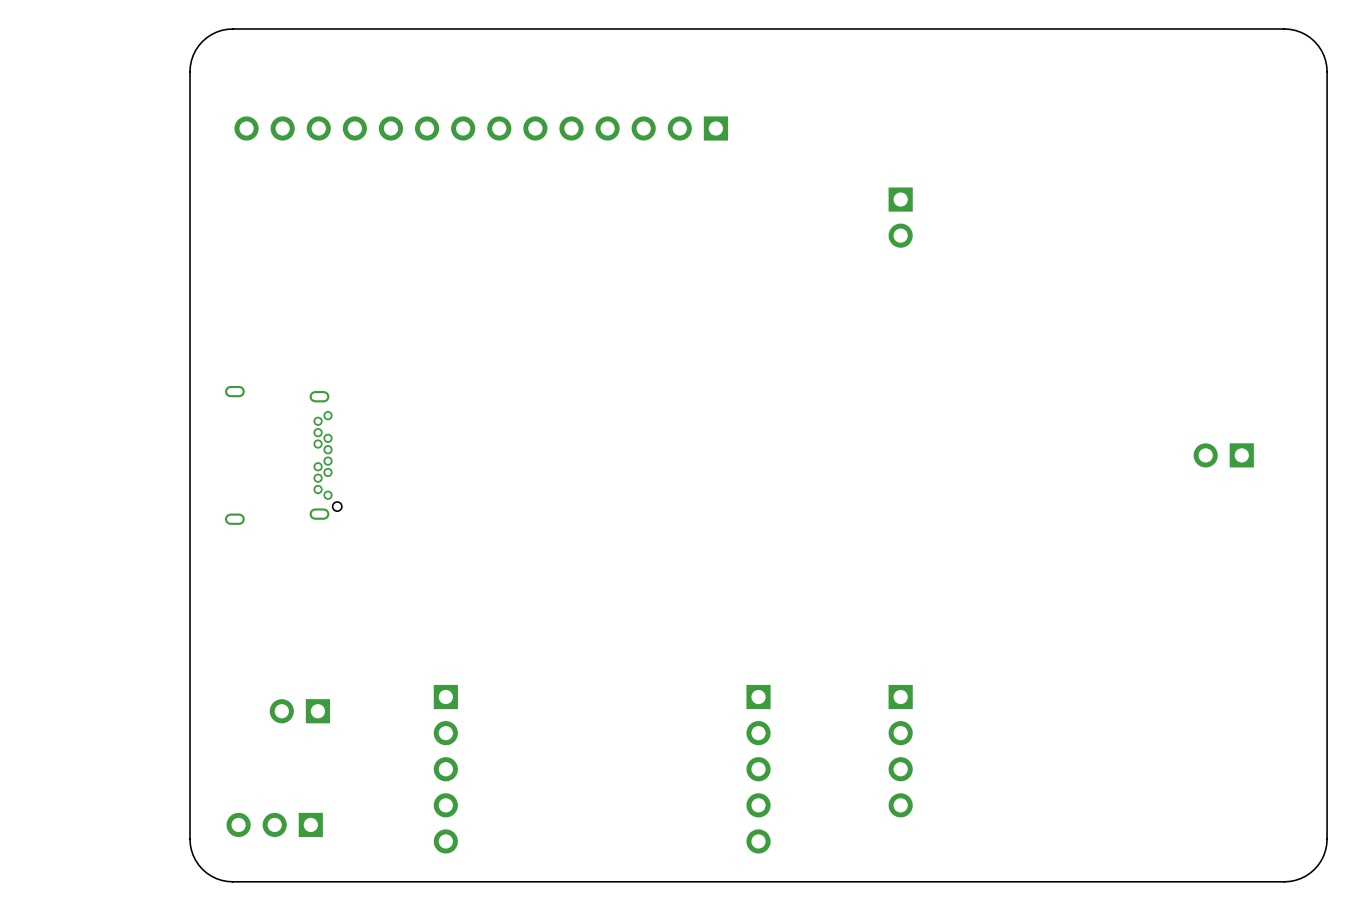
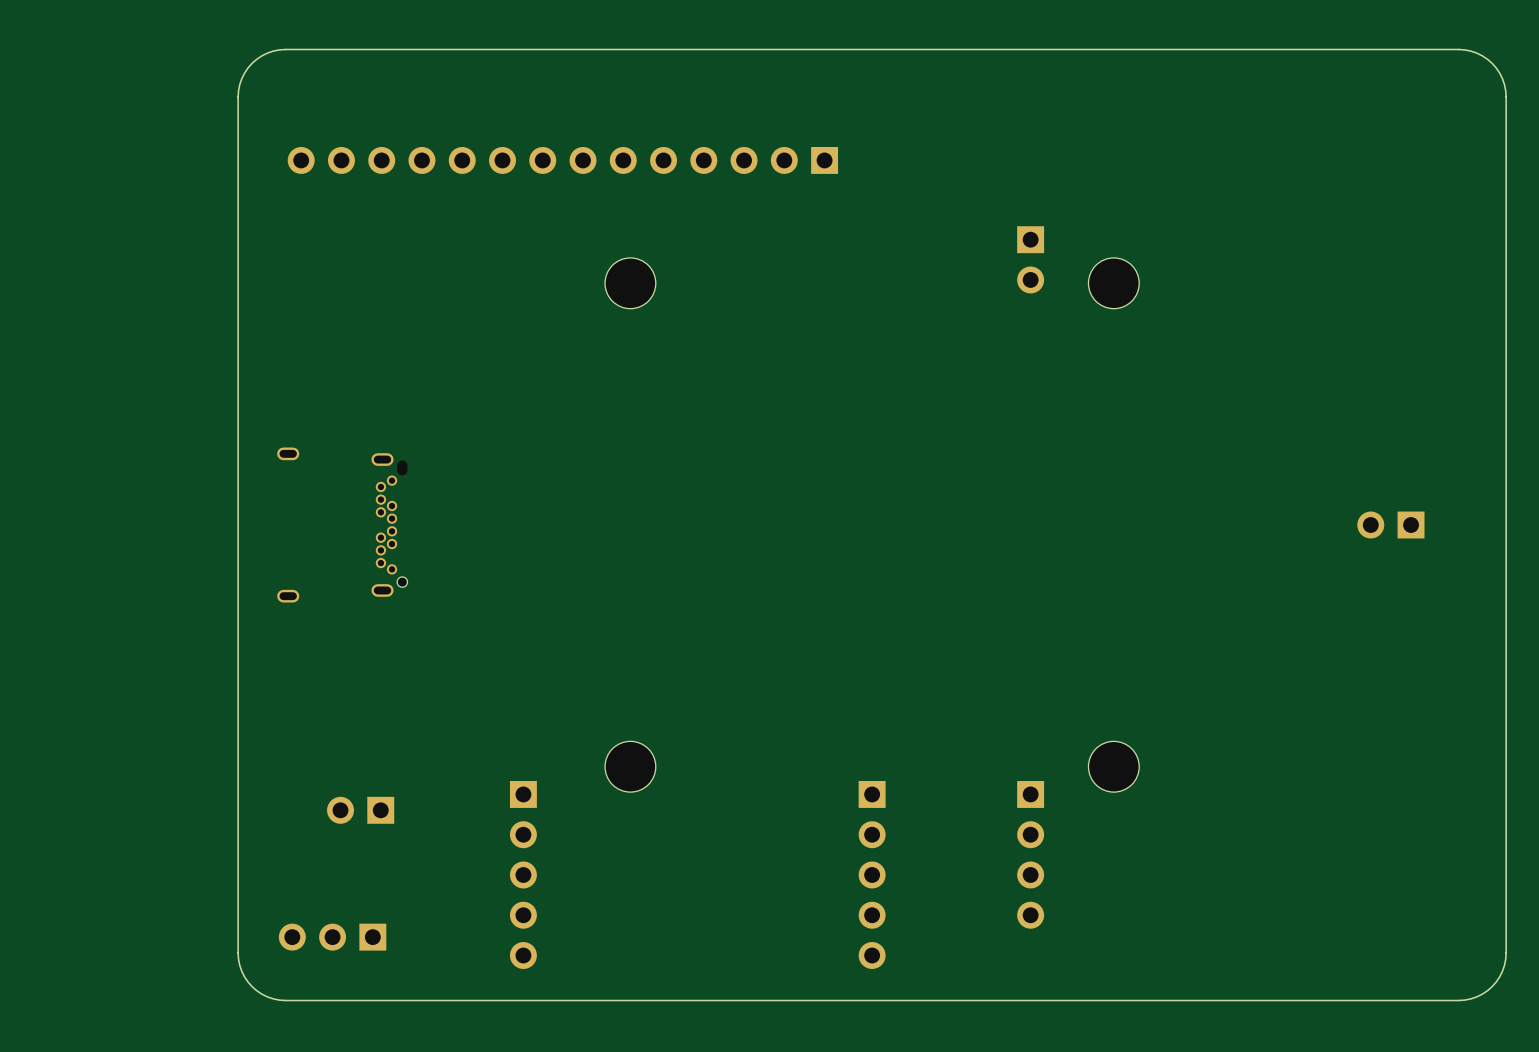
part: none -> (630, 283)
part: none -> (1113, 283)
part: none -> (630, 766)
part: none -> (1113, 766)

